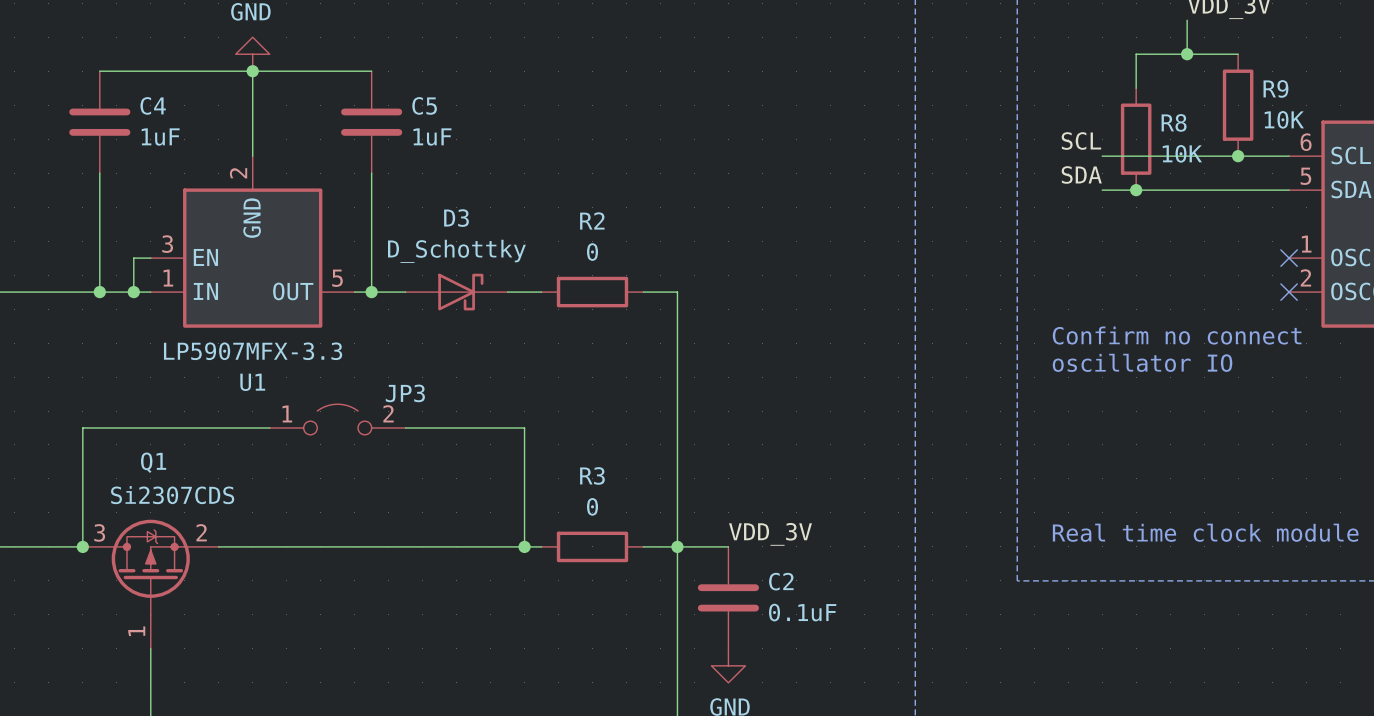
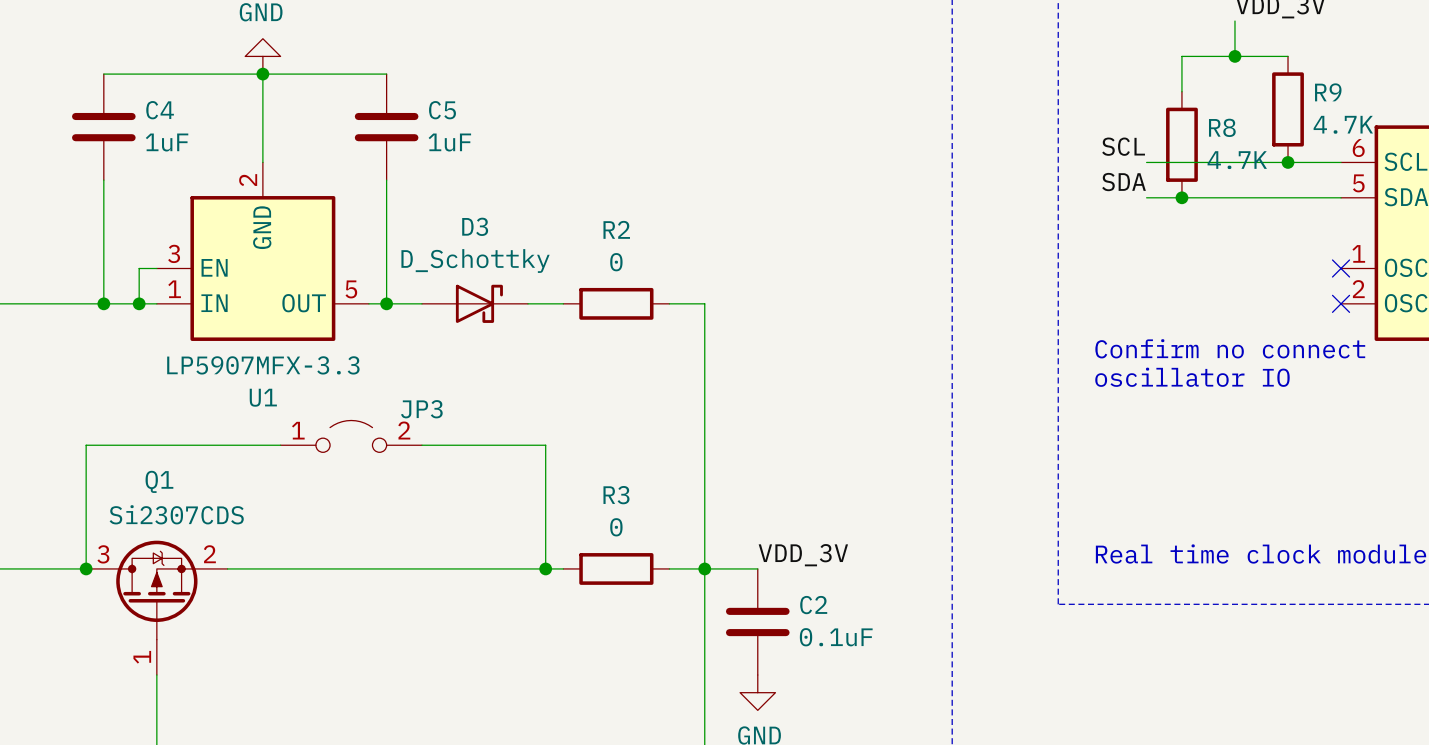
R9 value: 10K (1284, 119) -> 4.7K (1343, 124)
R8 value: 10K (1182, 153) -> 4.7K (1237, 160)

